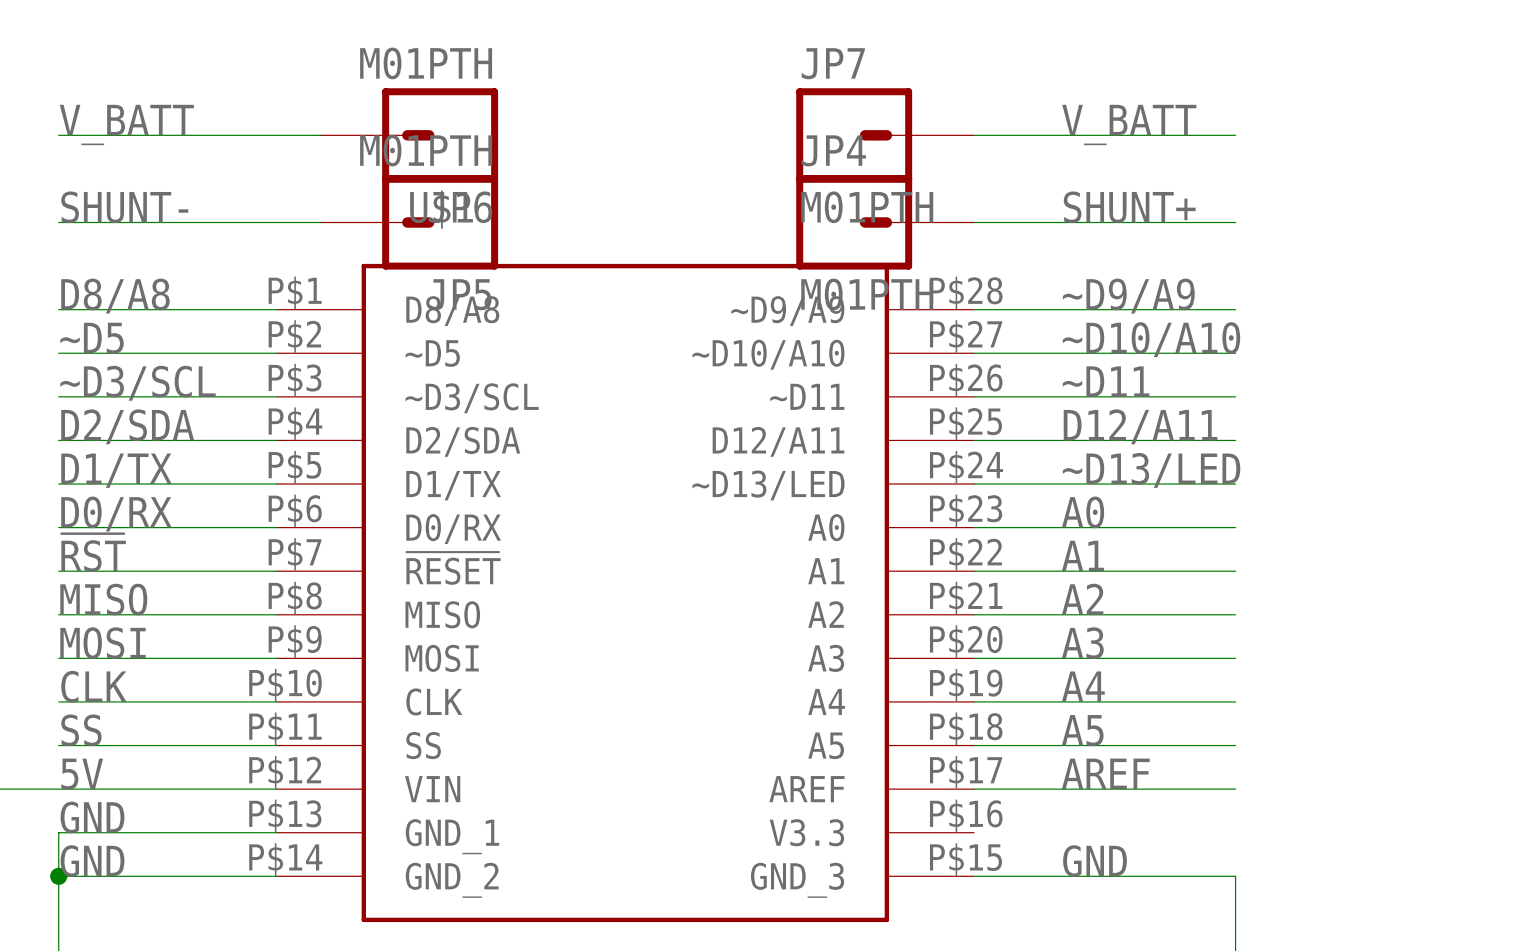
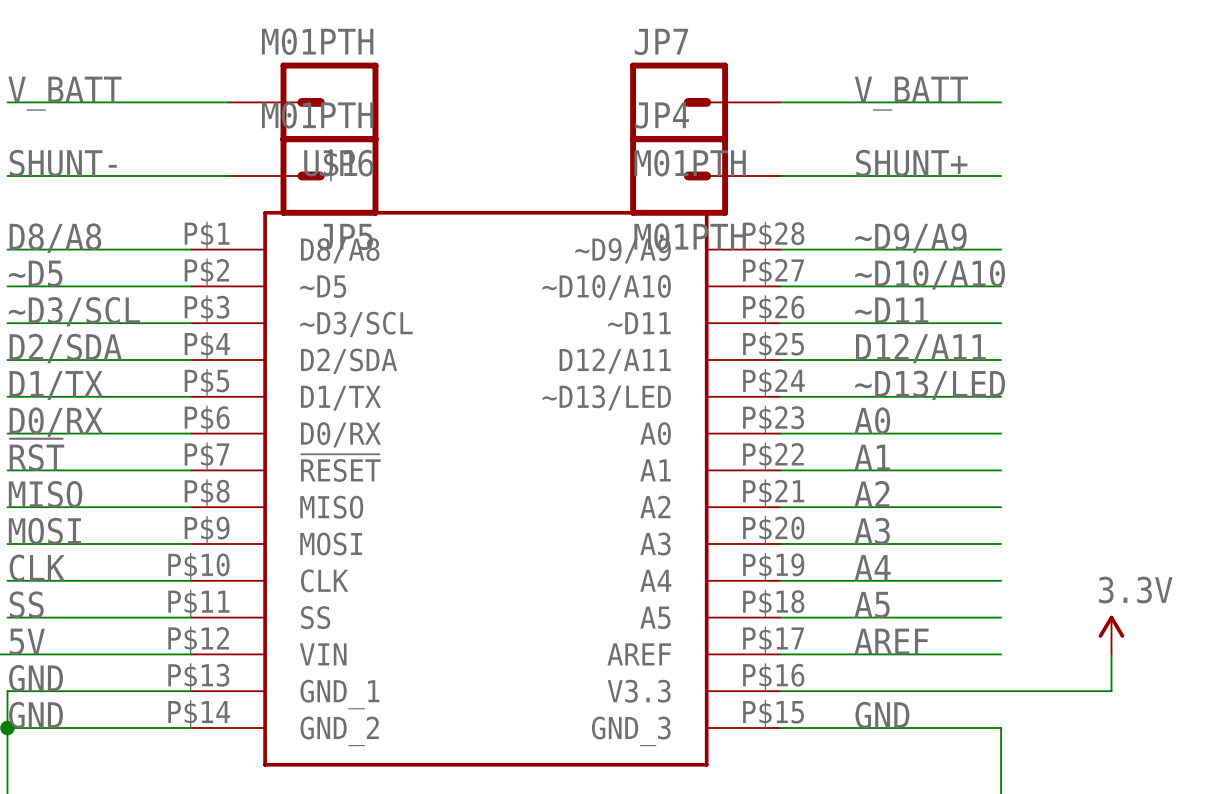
power symbol: none -> 3.3V (1111, 635)
wire: none -> (1111, 654) (1111, 691) (780, 691)

